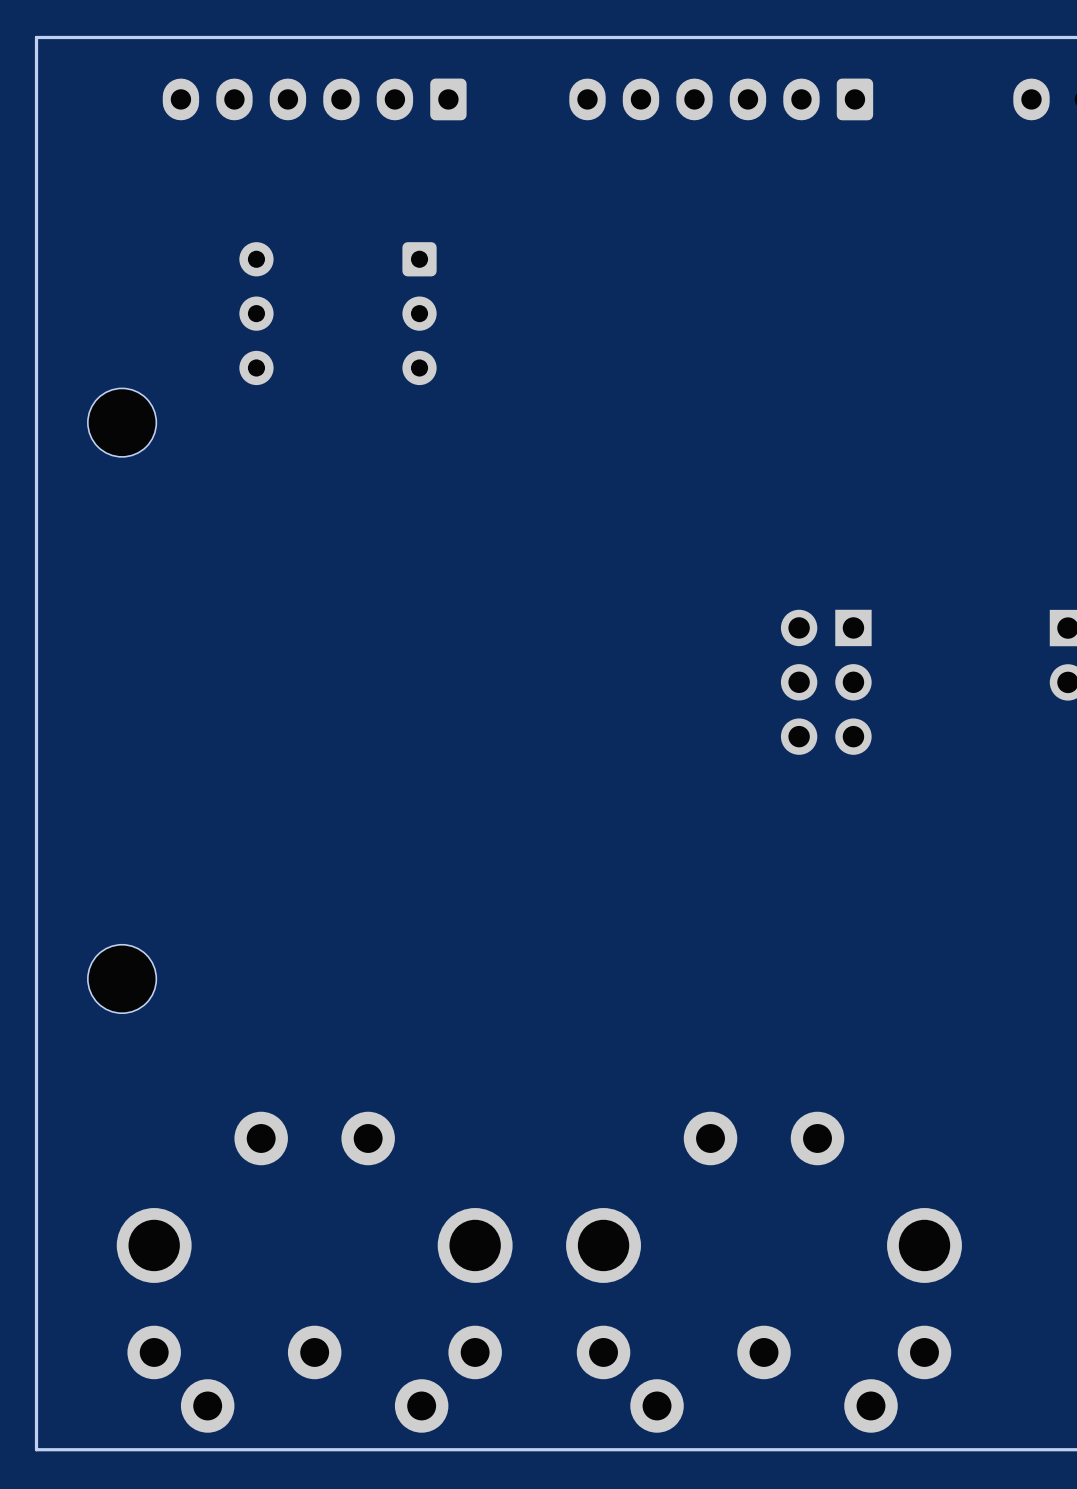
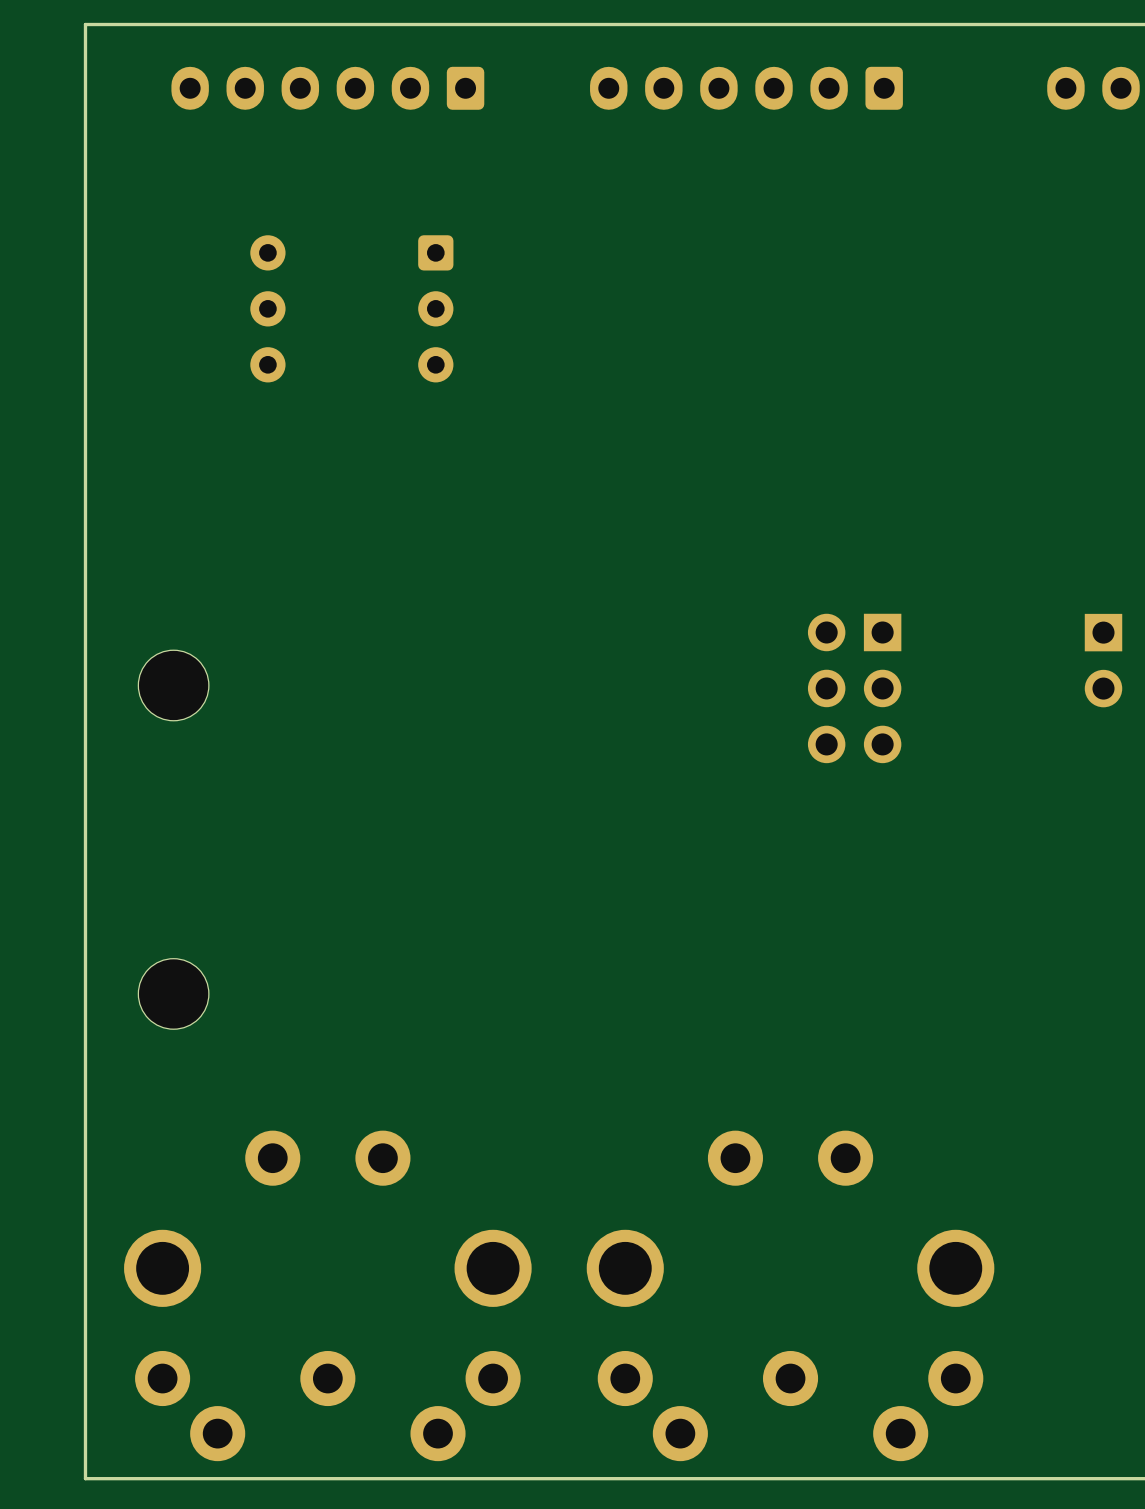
board edge: (79, 37) (36, 37) (36, 1449) (79, 1449) -> (85, 24) (85, 1478)
part: (122, 422) -> none
part: none -> (173, 685)
part position: (122, 978) -> (173, 993)

